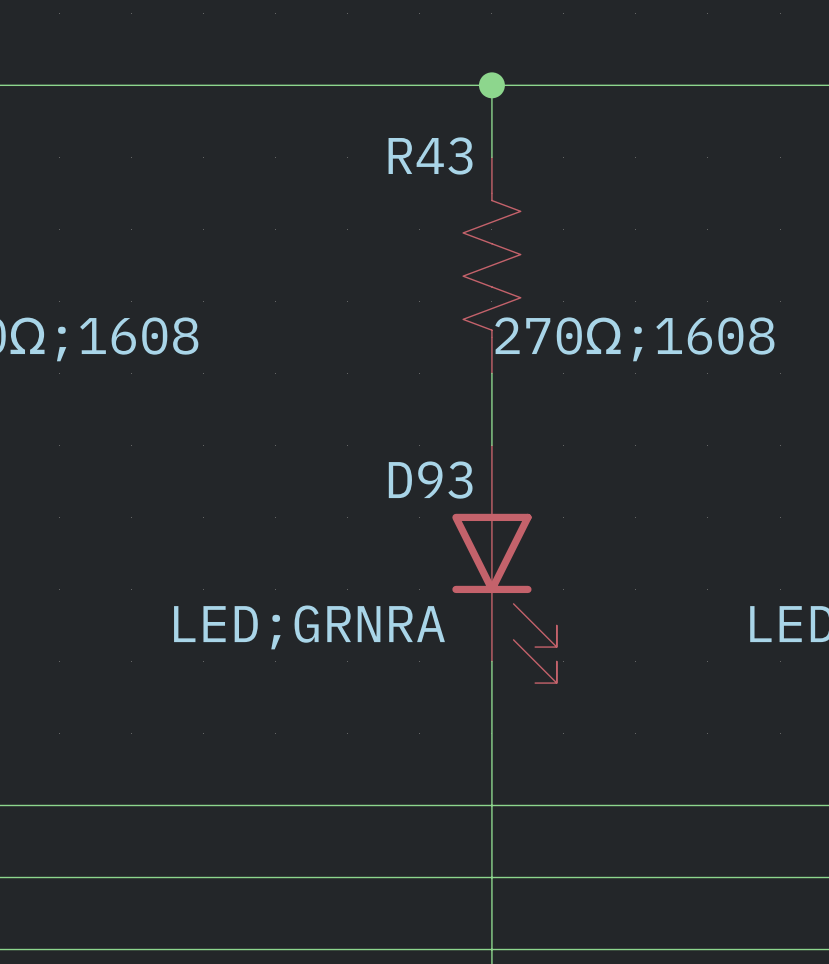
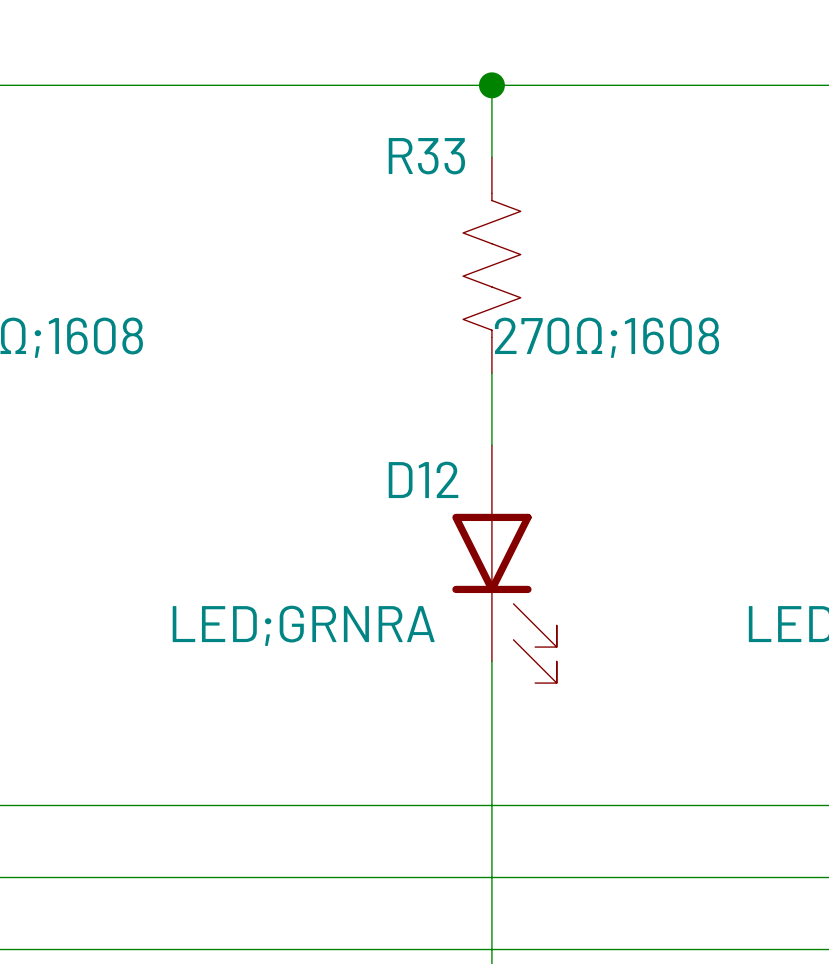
R43 name: R43 (430, 155) -> R33 (426, 156)
D93 name: D93 (430, 480) -> D12 (423, 479)

